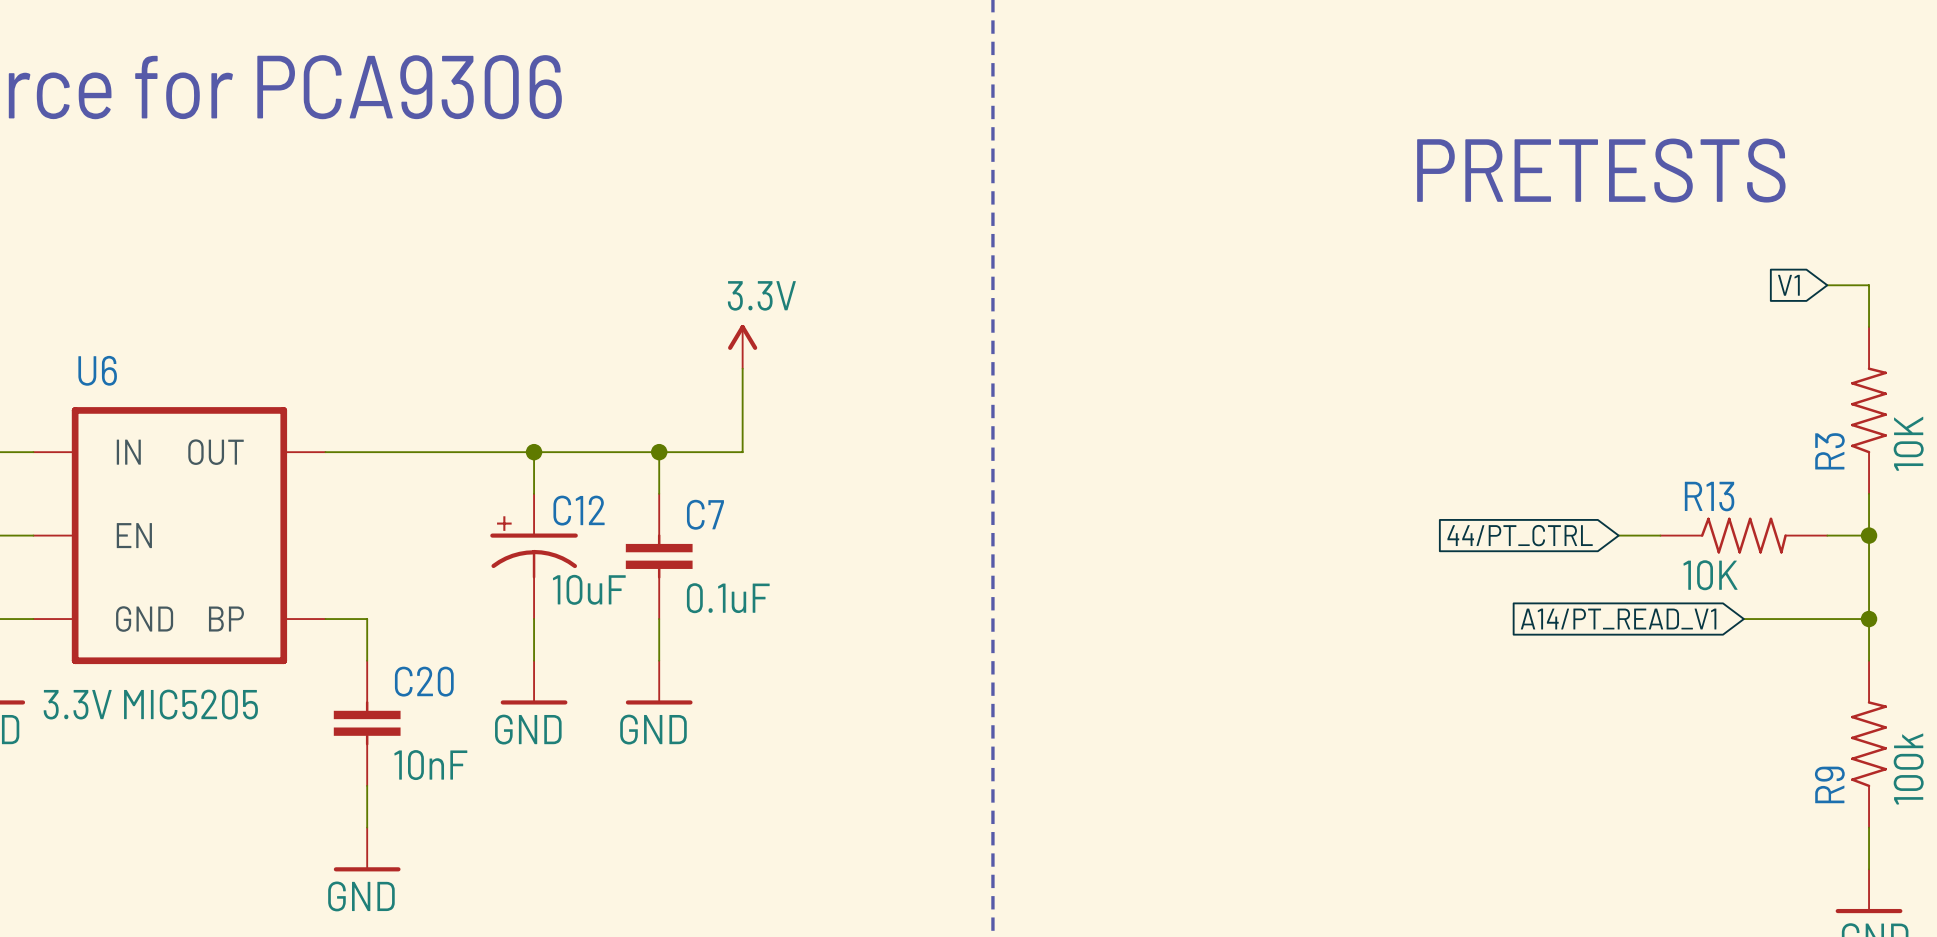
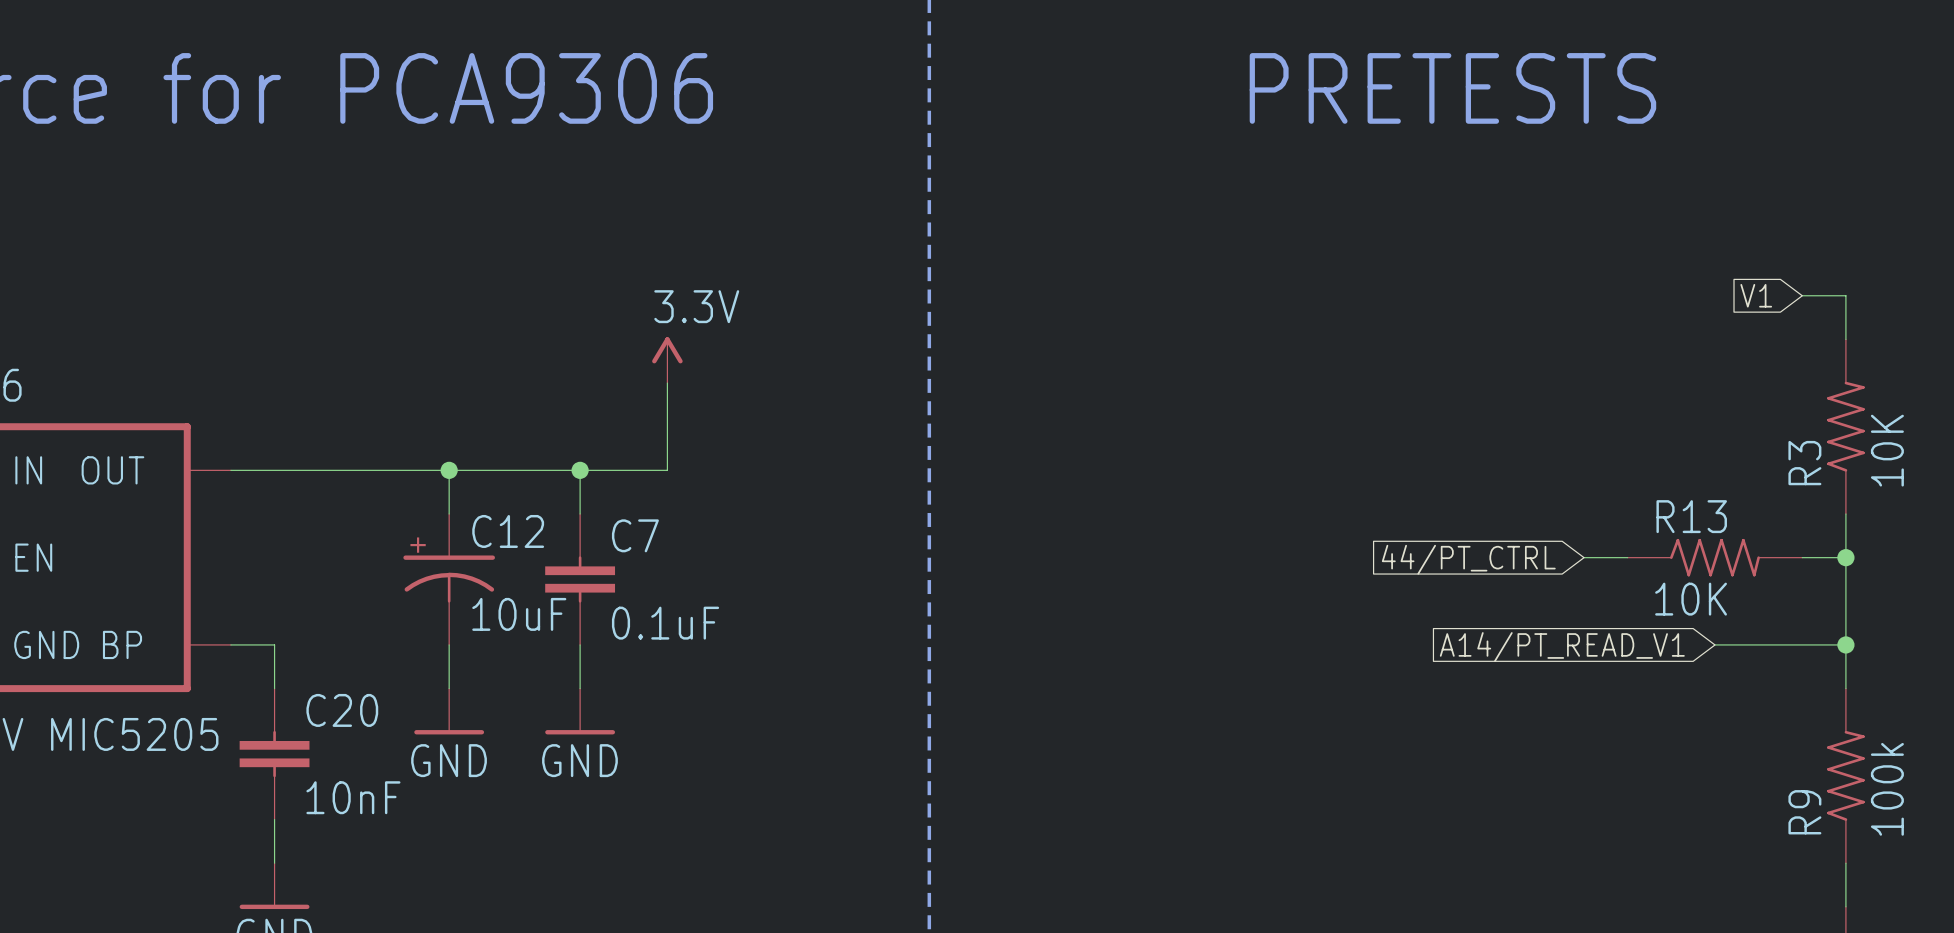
text position: PRETESTS (1601, 170) -> PRETESTS (1452, 88)

